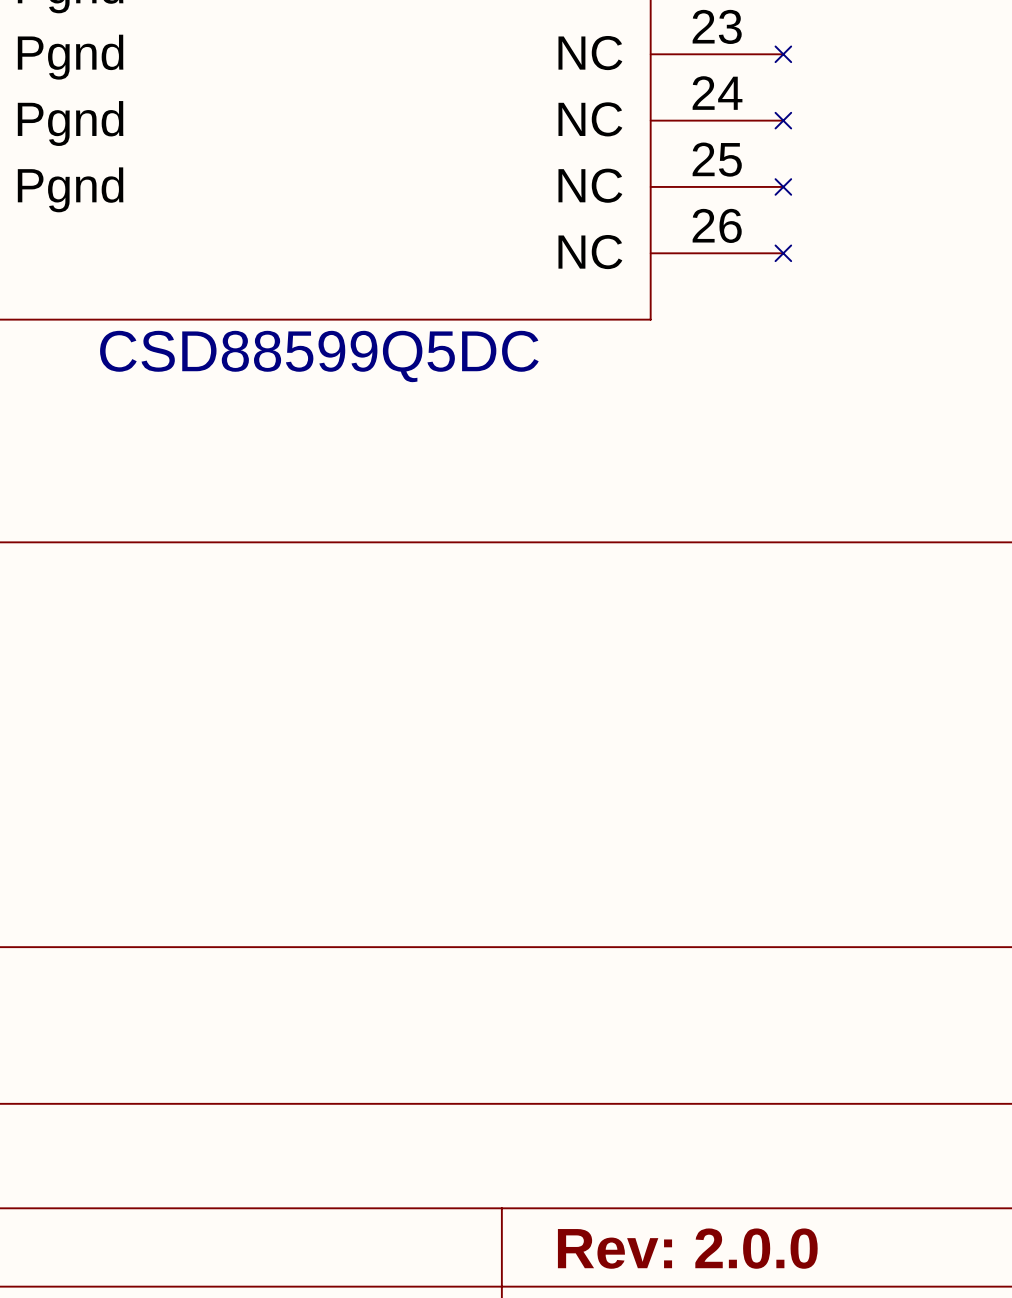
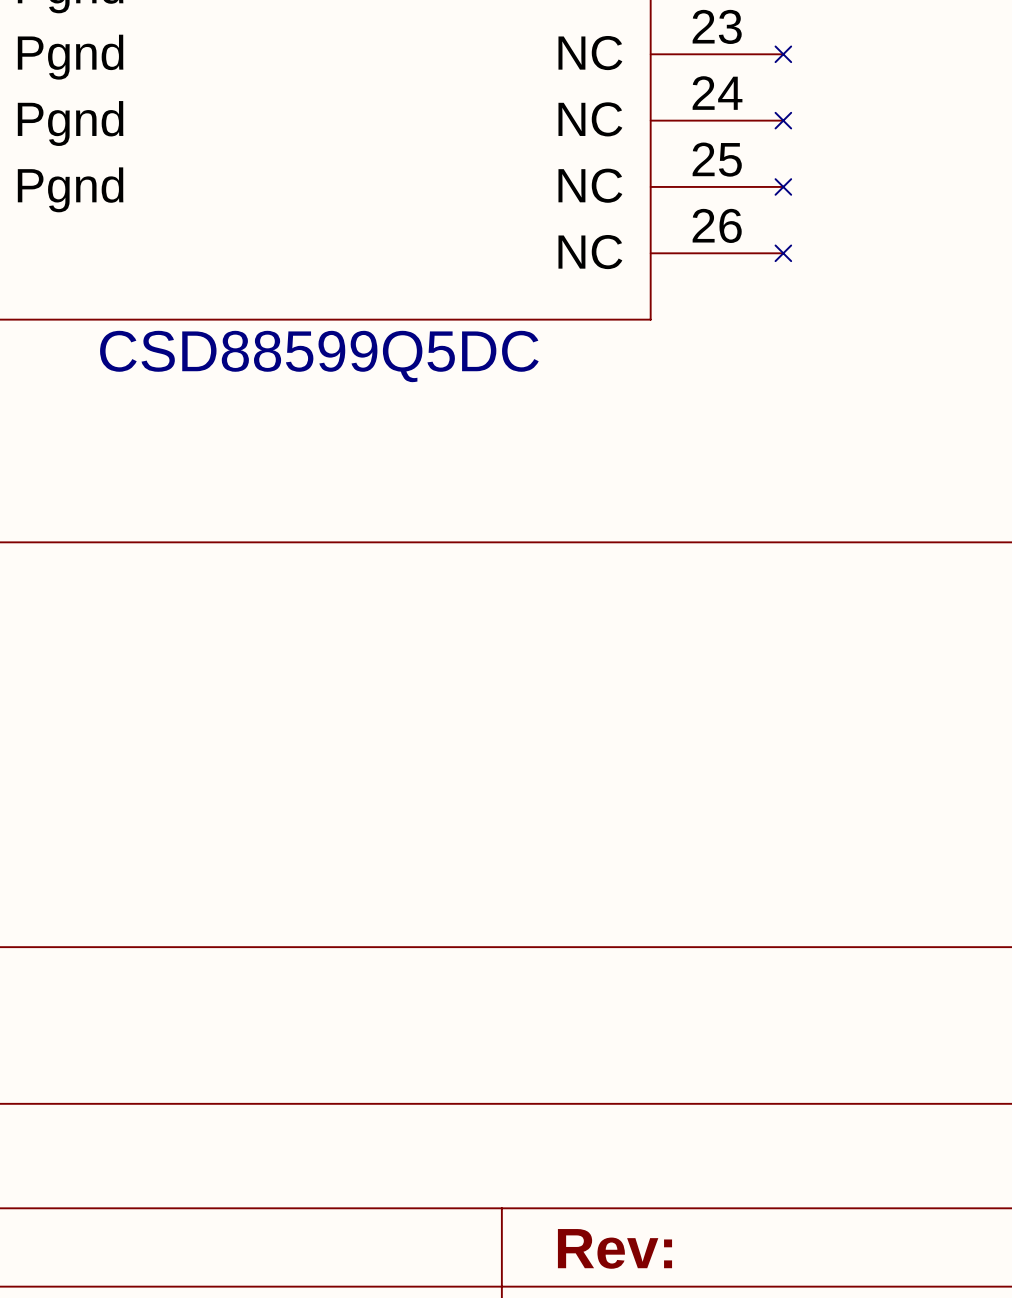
title block: Rev: 2.0.0 (687, 1248) -> Rev: (614, 1248)

